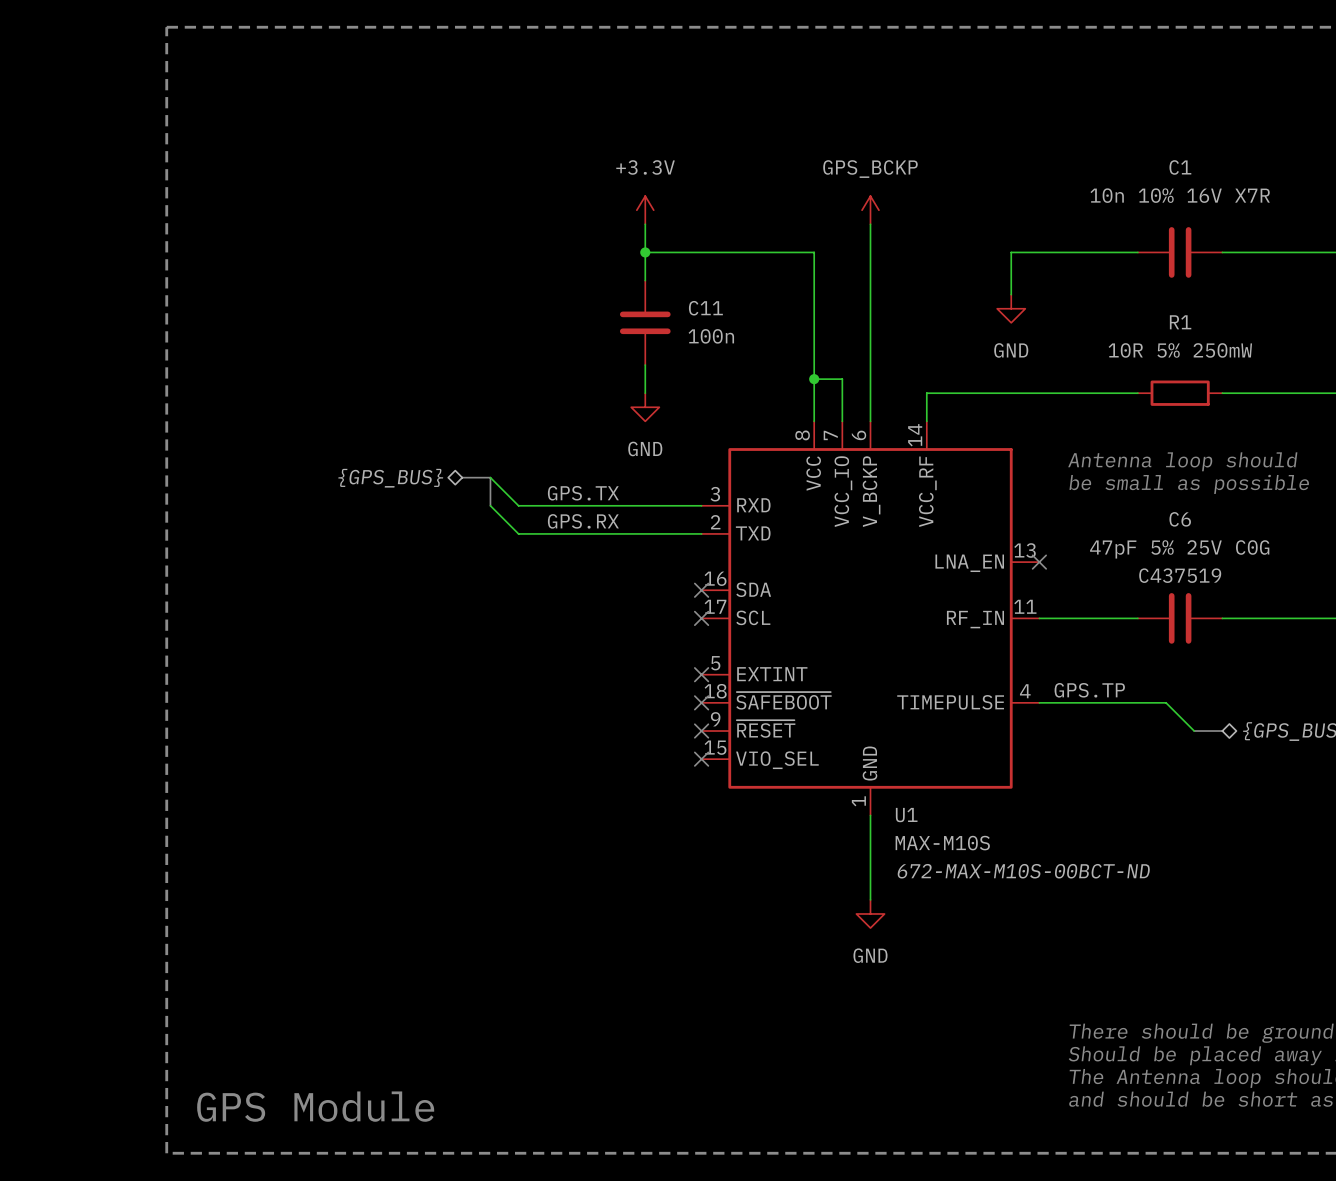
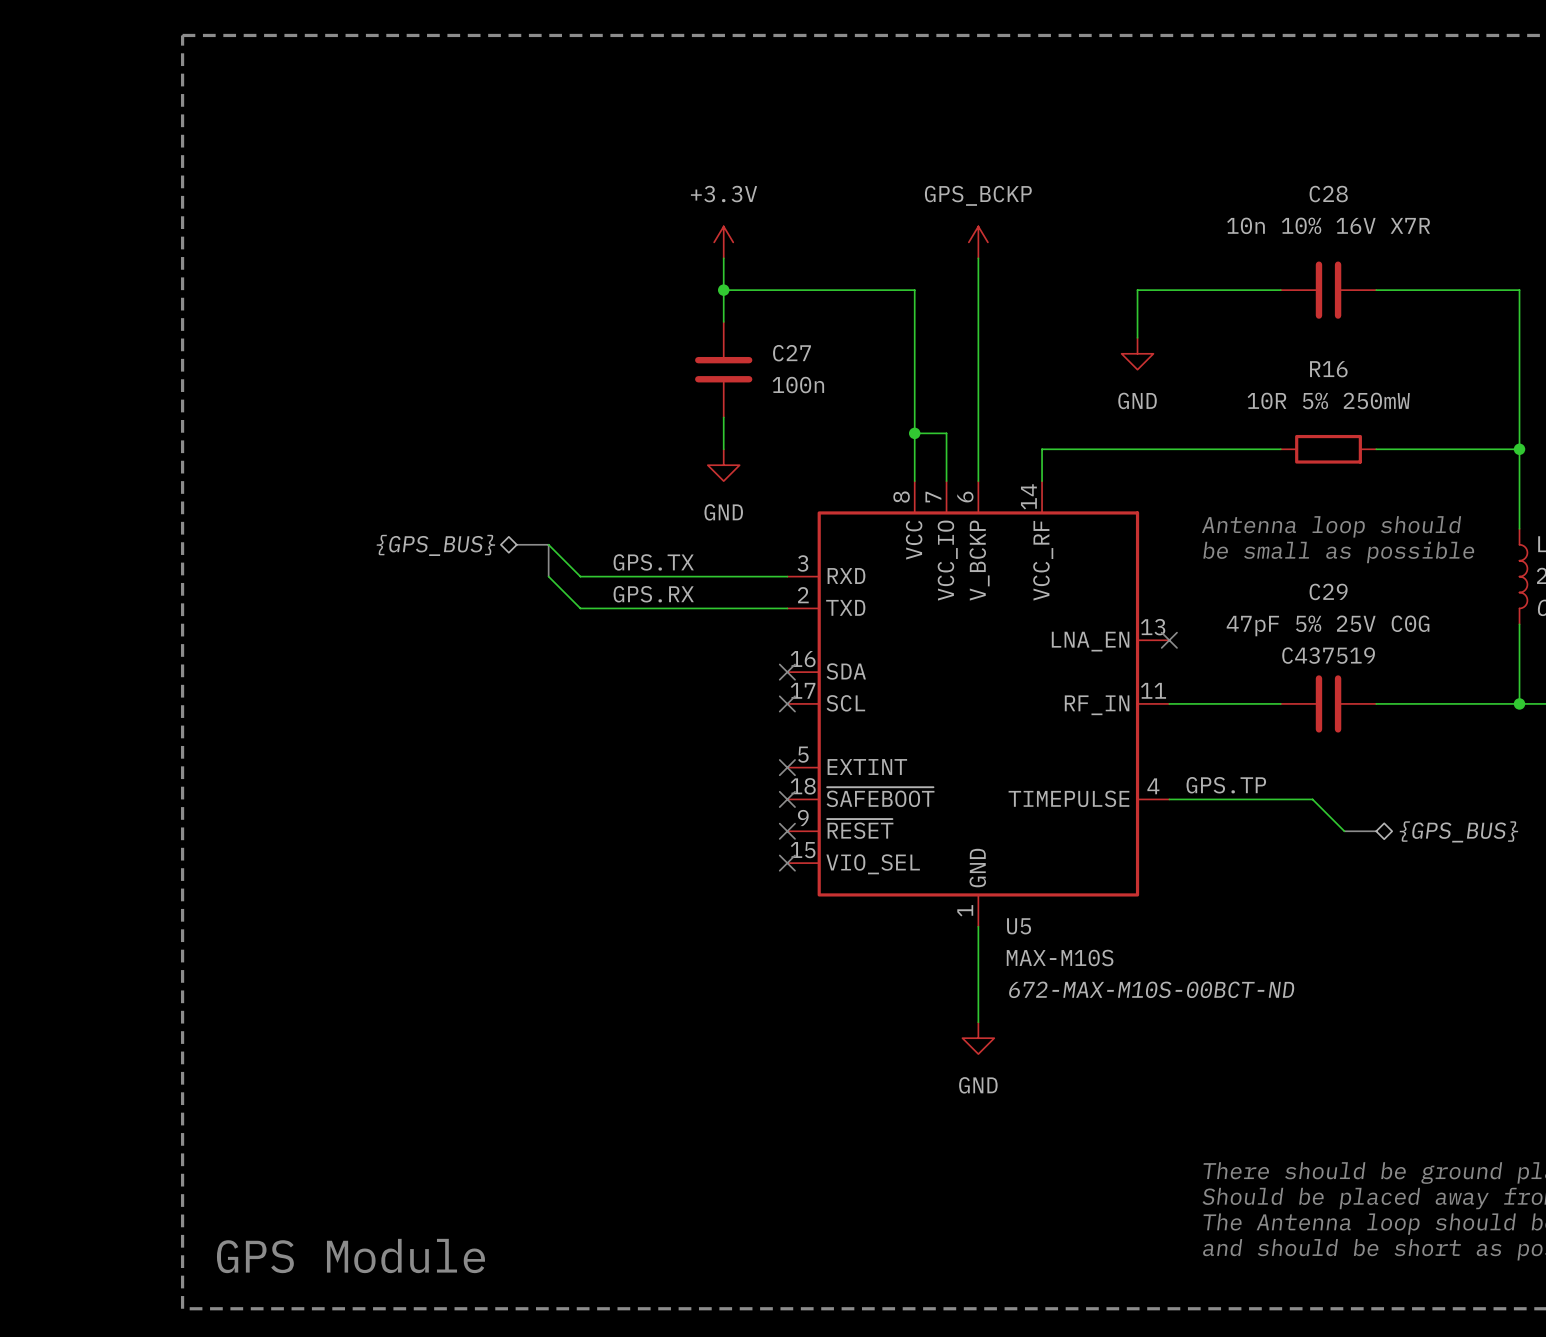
C1 name: C1 (1180, 167) -> C28 (1328, 194)
C11 name: C11 (705, 308) -> C27 (792, 353)
R1 name: R1 (1180, 322) -> R16 (1328, 369)
C6 name: C6 (1180, 519) -> C29 (1328, 591)
U1 name: U1 (906, 815) -> U5 (1019, 926)

